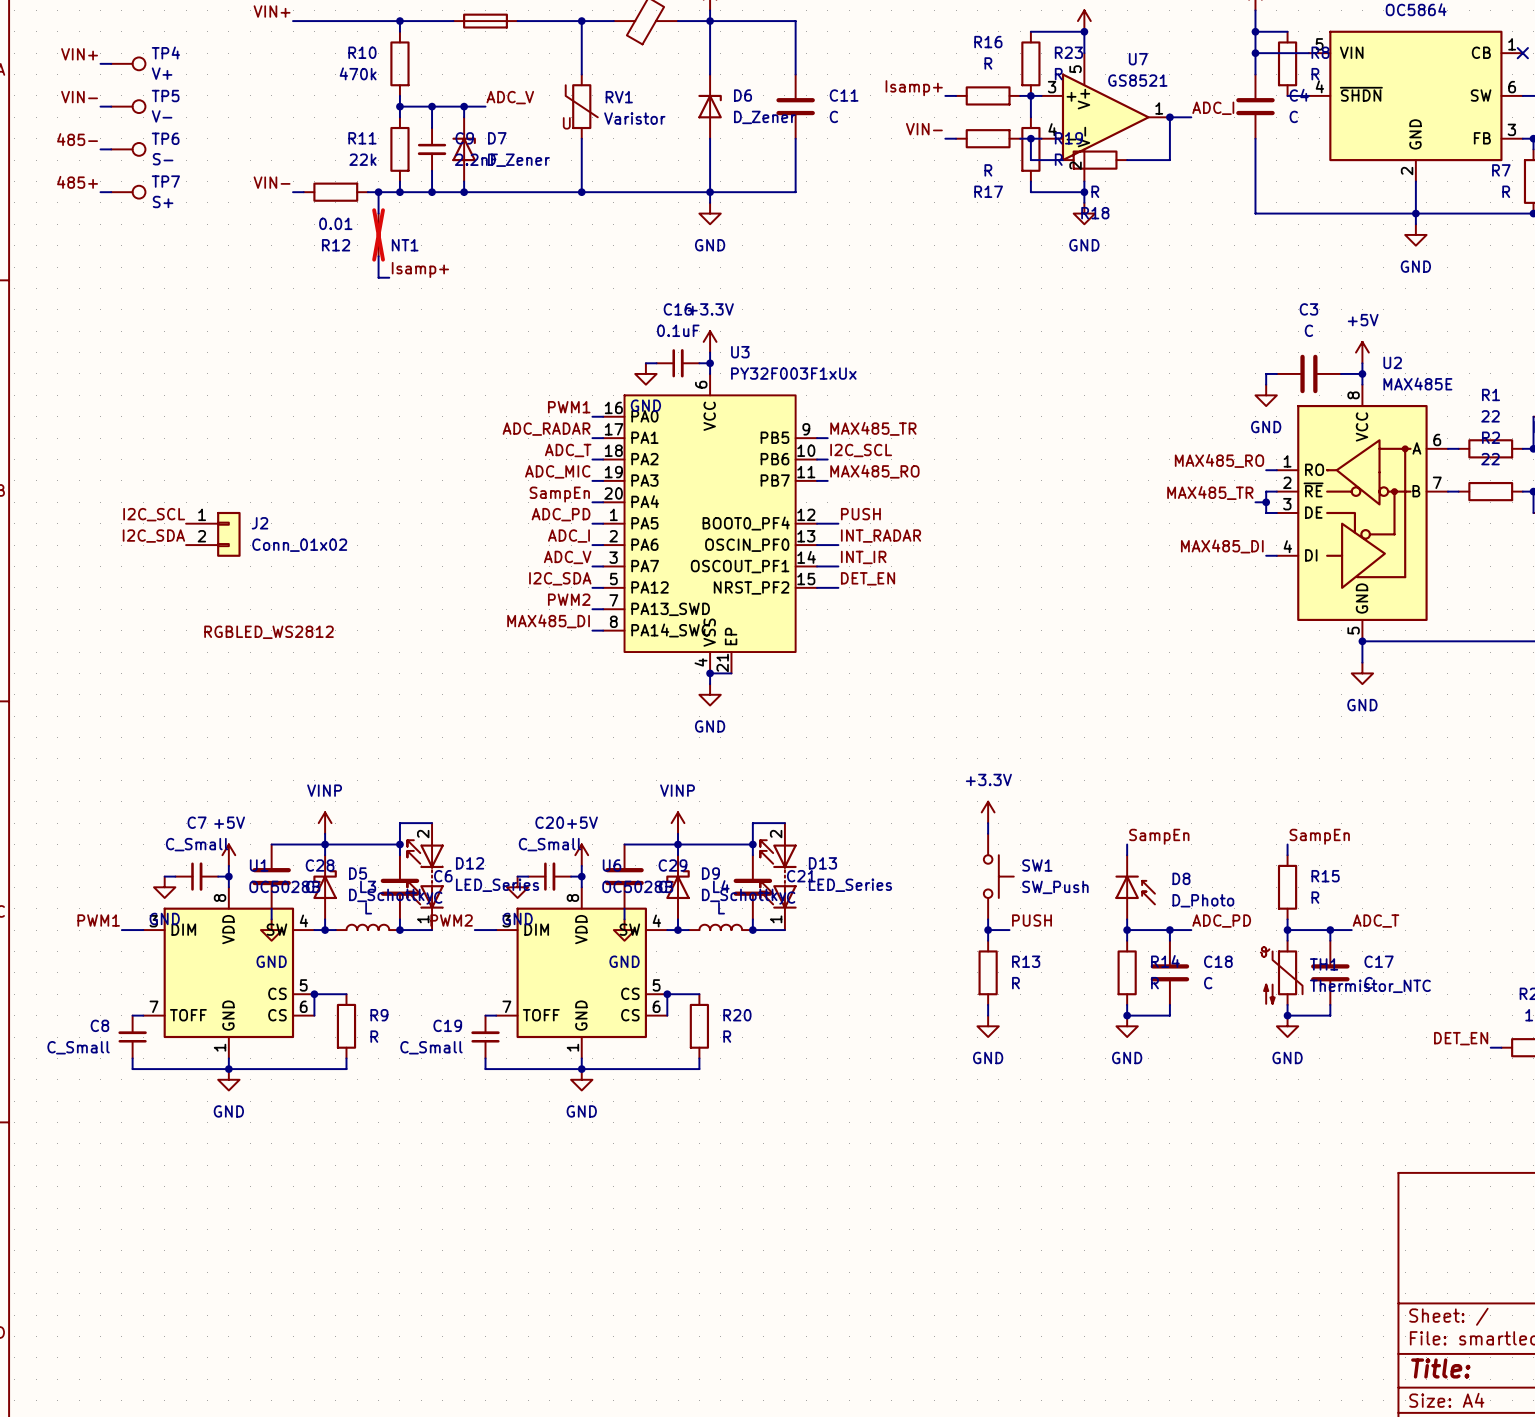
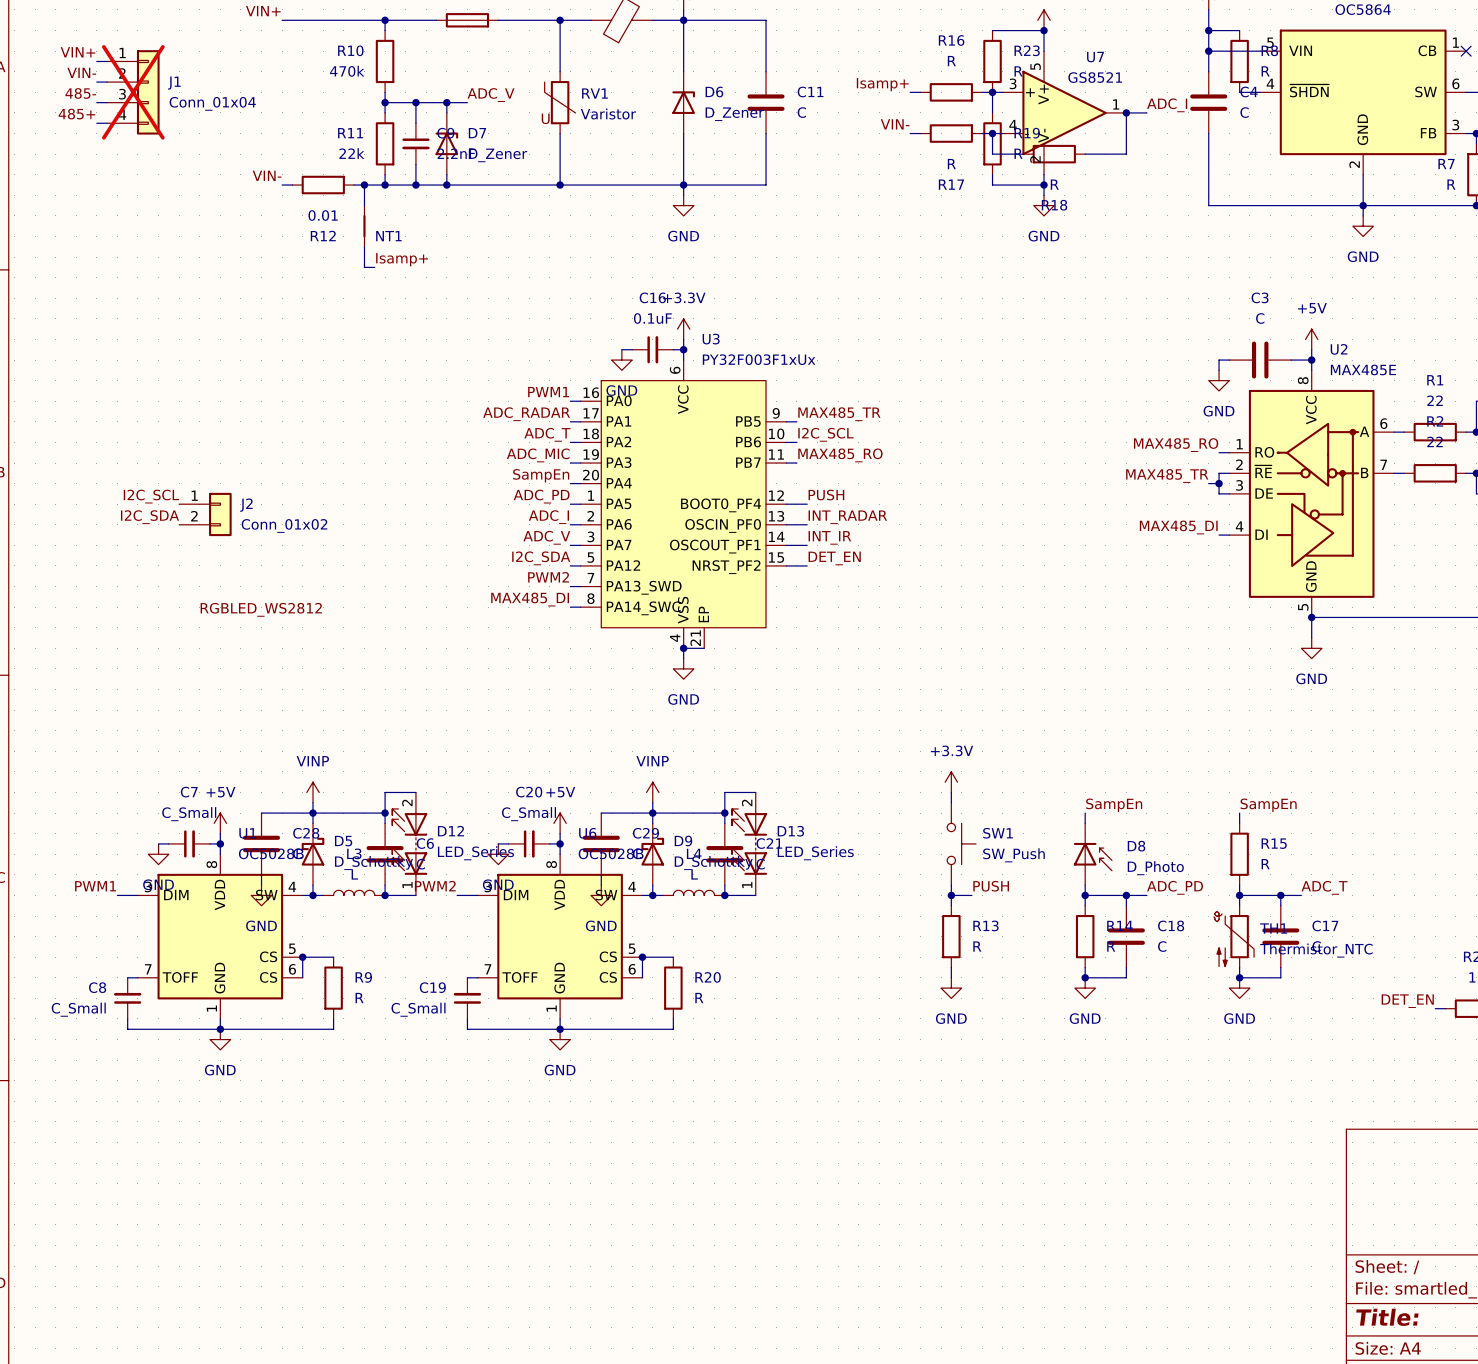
TP4: V+ (128, 63) -> none
label: none -> VIN- (81, 72)
J1: none -> Conn_01x04 (133, 92)
label: VIN- (79, 97) -> 485- (80, 93)
TP5: V- (128, 106) -> none
label: 485- (77, 139) -> none
wire: (100, 149) (111, 149) -> (96, 82) (107, 82)
TP6: S- (128, 149) -> none
label position: 485+ (77, 182) -> 485+ (76, 114)
wire: (100, 192) (111, 192) -> (96, 123) (107, 123)
TP7: S+ (128, 192) -> none
NT1 do-not-place cross: (378, 234) -> none

